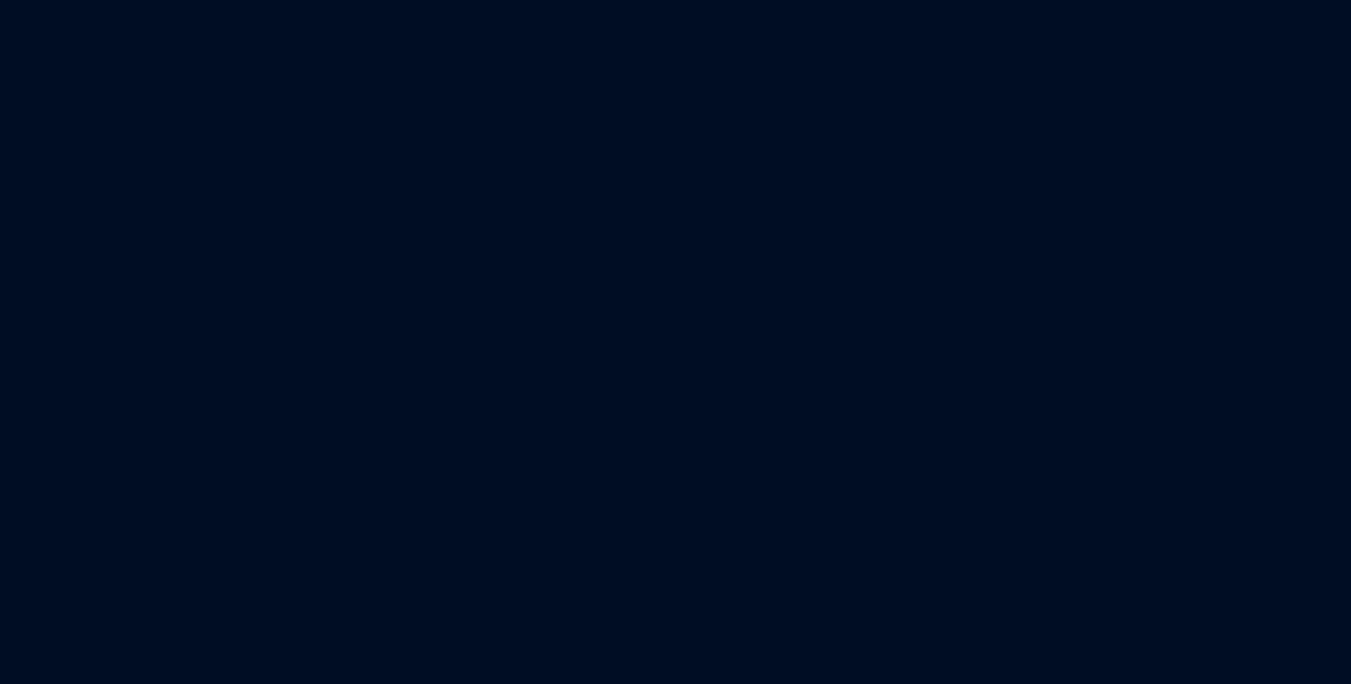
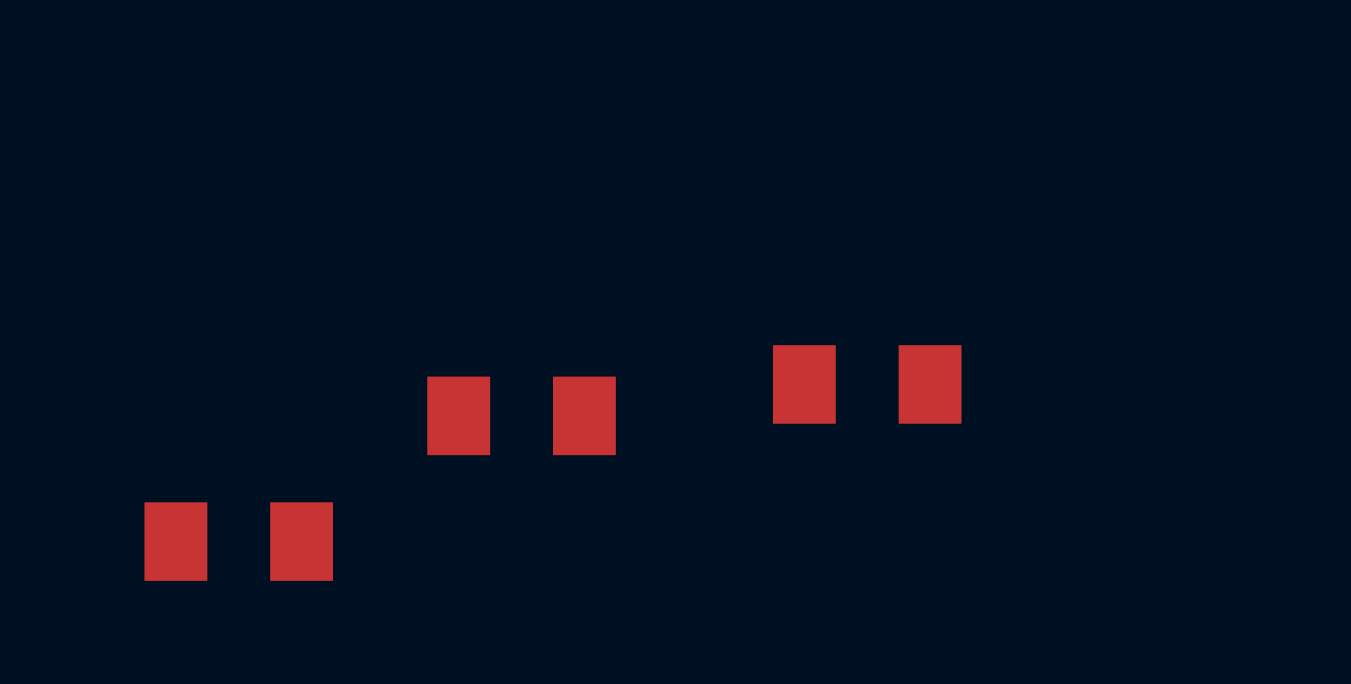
part: none -> (867, 384)
part: none -> (521, 415)
part: none -> (238, 541)

